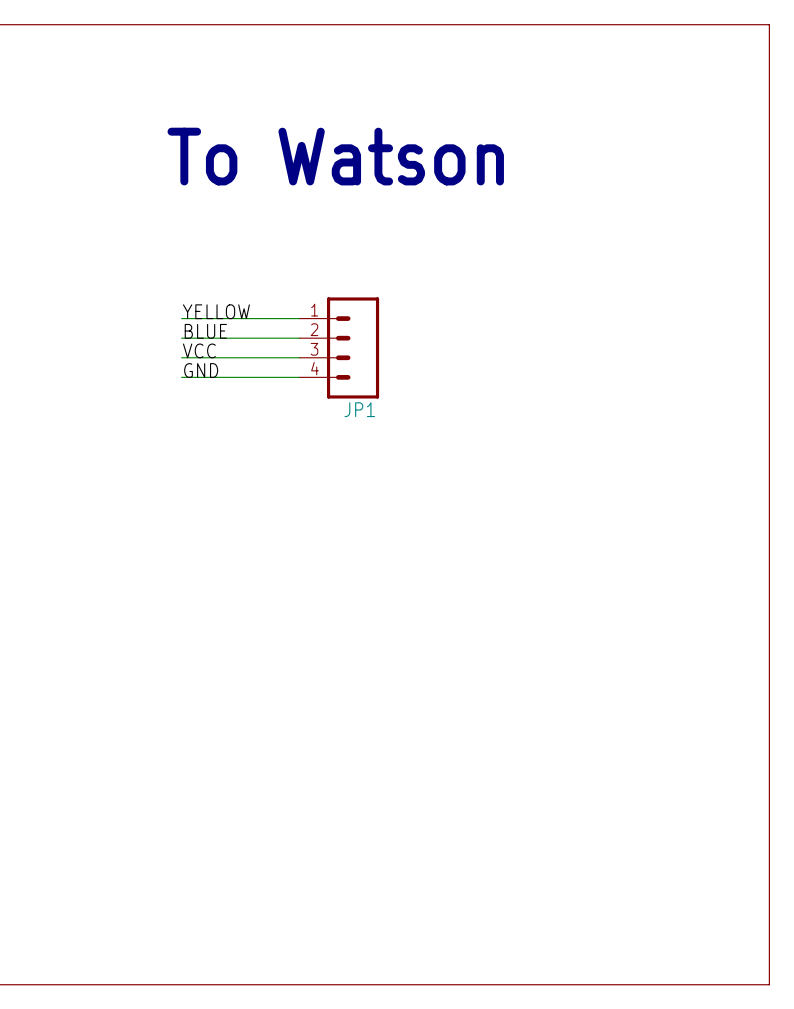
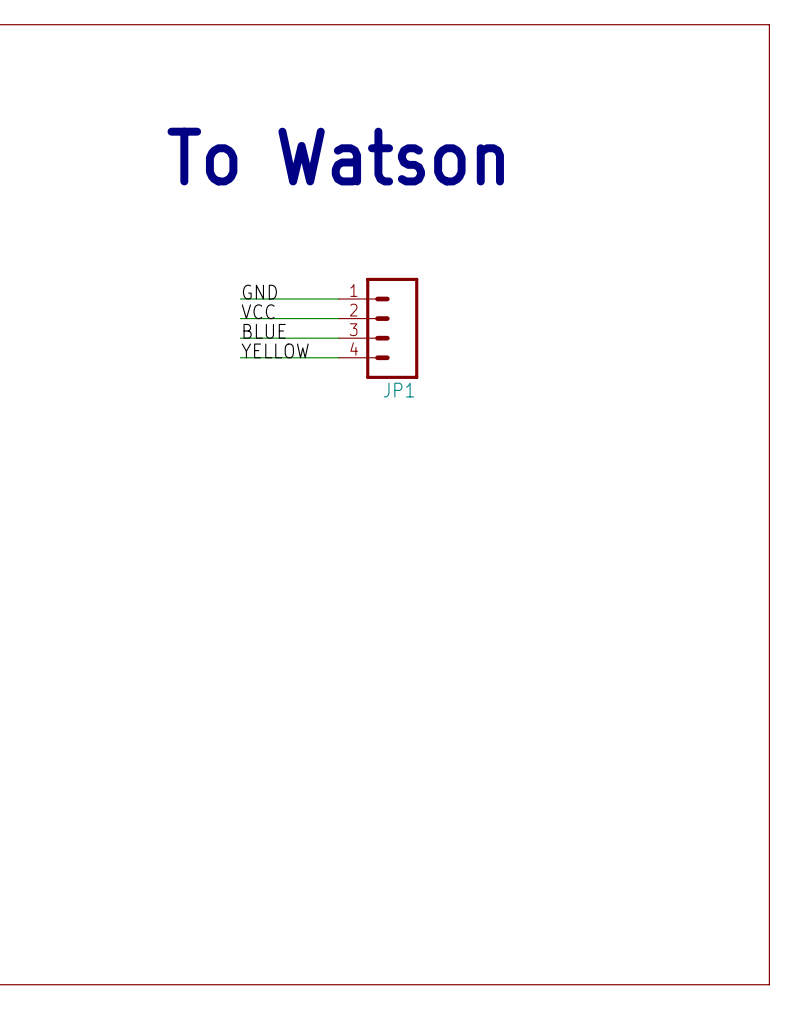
wire: none -> (240, 299) (338, 299)
label position: YELLOW (216, 311) -> YELLOW (275, 350)
wire: (181, 318) (240, 318) -> none
label position: BLUE (205, 331) -> BLUE (264, 331)
wire: (181, 338) (240, 338) -> none
JP1 position: (339, 347) -> (378, 328)
label position: VCC (199, 350) -> VCC (258, 311)
wire: (181, 357) (240, 357) -> none
label position: GND (201, 370) -> GND (259, 292)
wire: (181, 377) (299, 377) -> none

